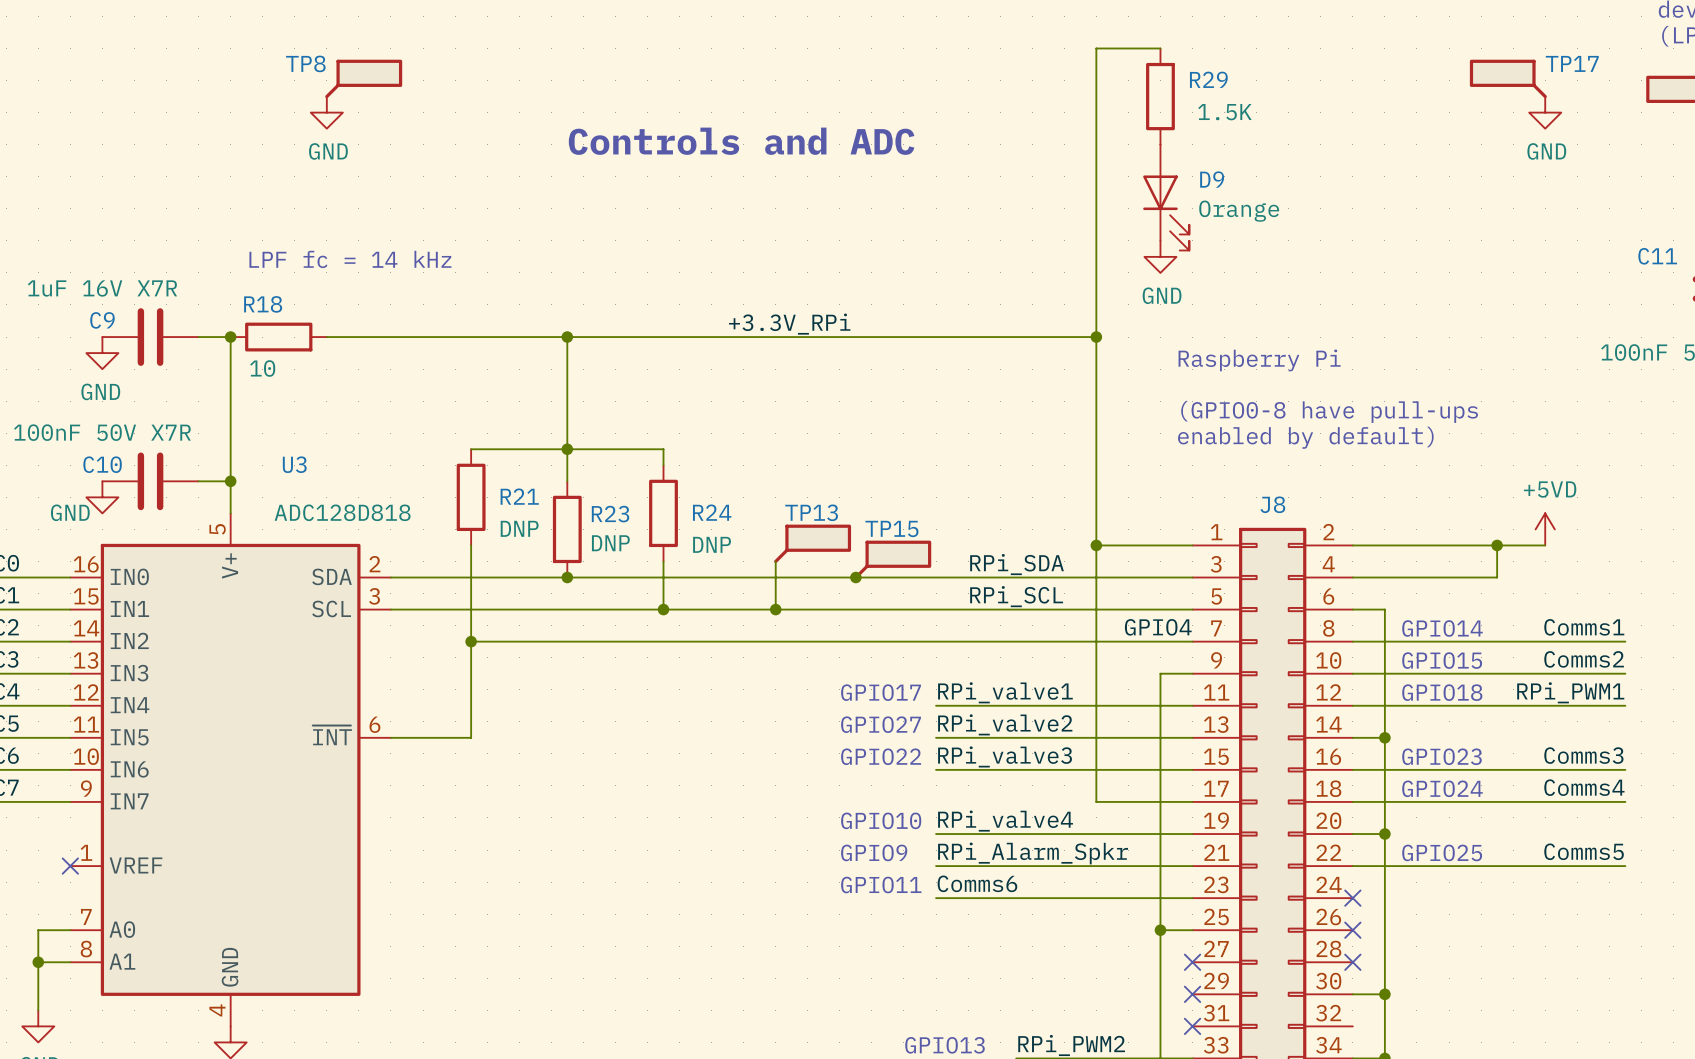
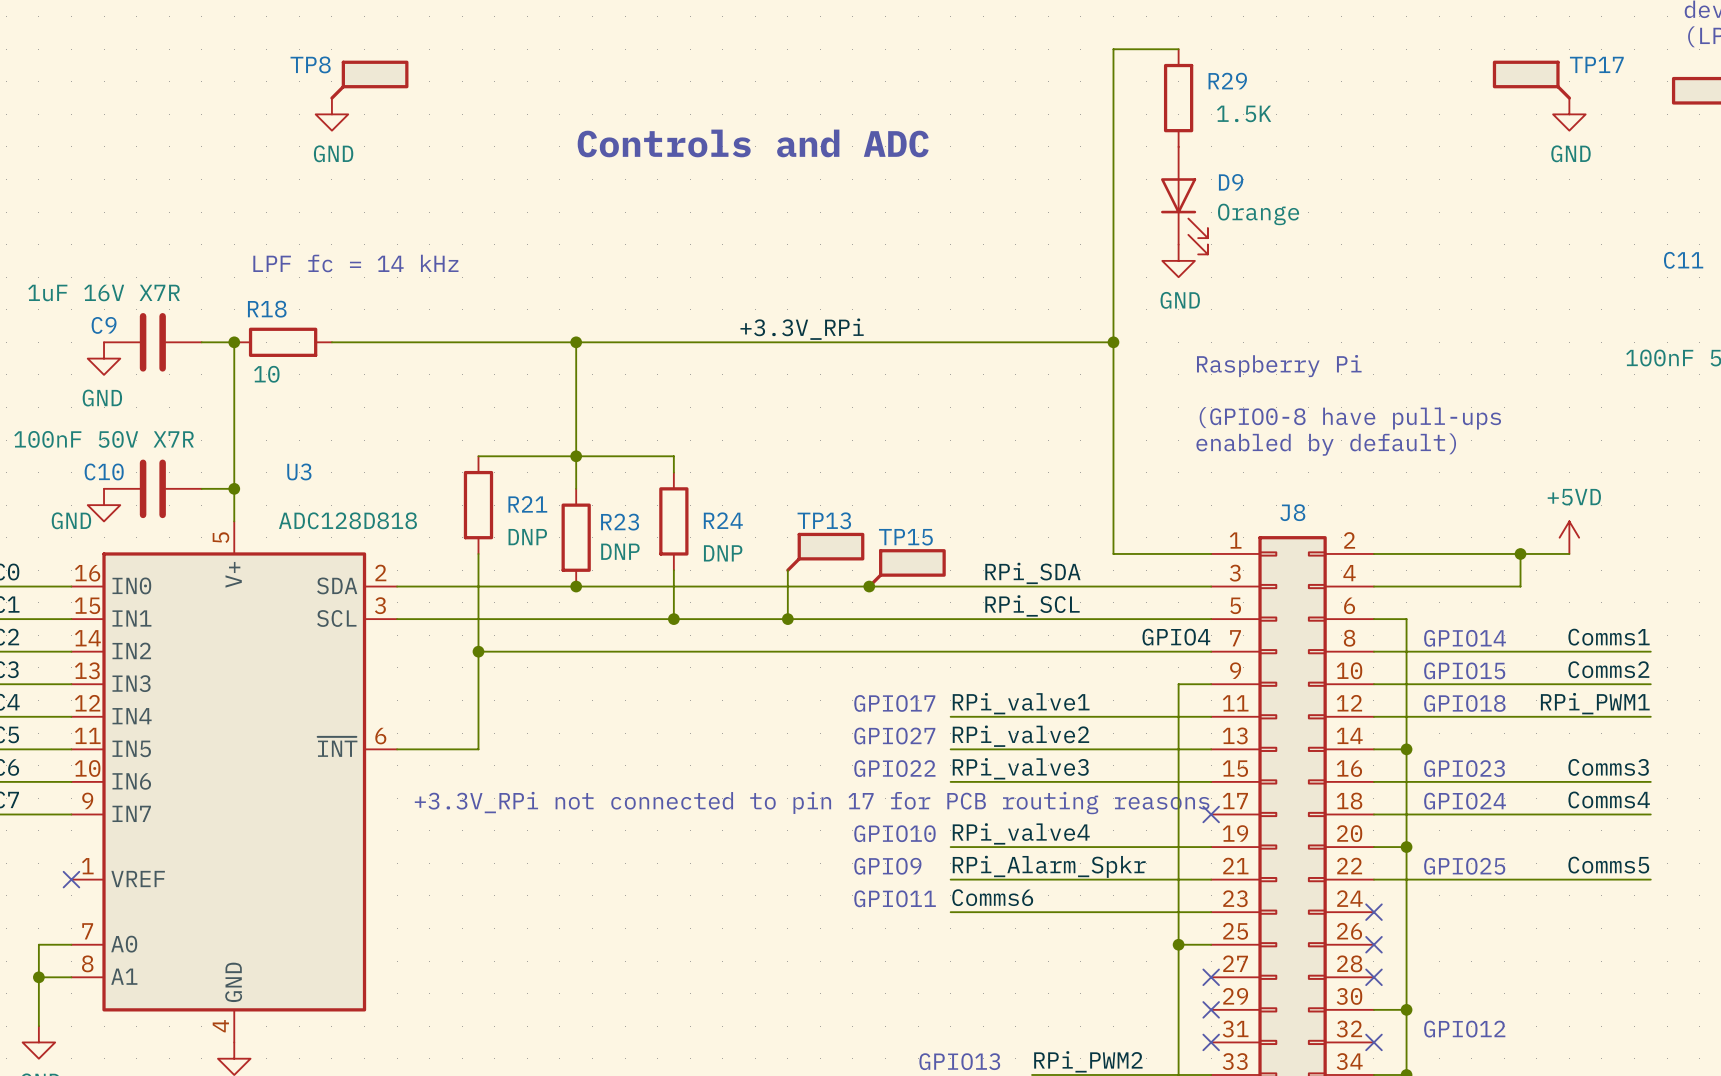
wire: (1096, 545) (1096, 801) (1192, 801) -> none
junction: (1096, 545) -> none
text: none -> +3.3V_RPi not connected to pin 17 for PCB routing reasons (812, 803)
no-connect mark: none -> (1211, 814)
text: none -> GPIO12 (1464, 1029)
no-connect mark: none -> (1373, 1042)

